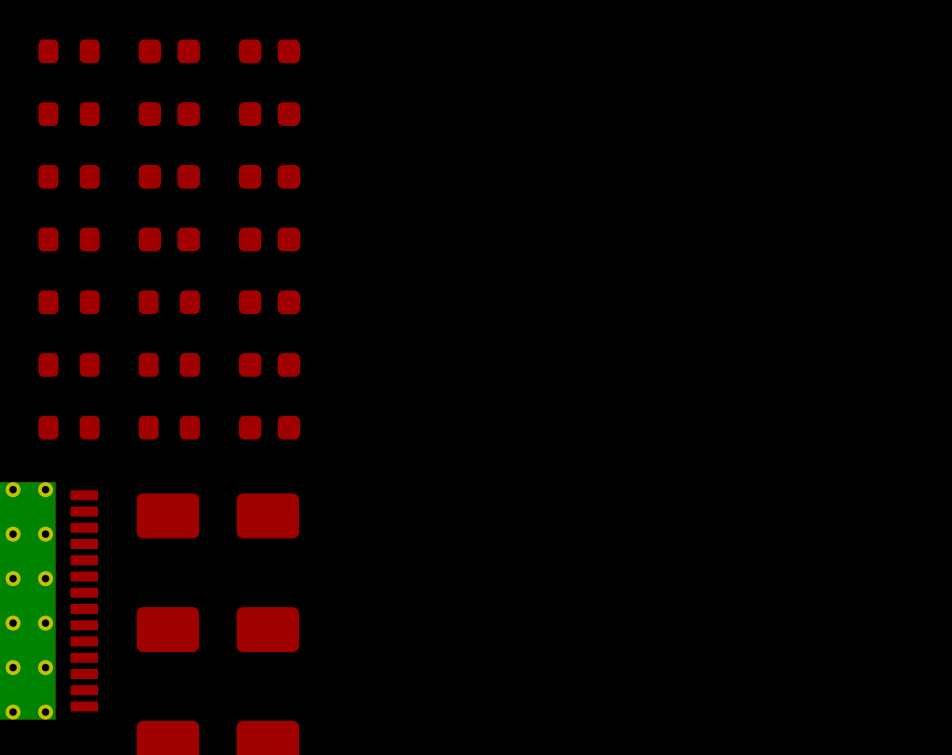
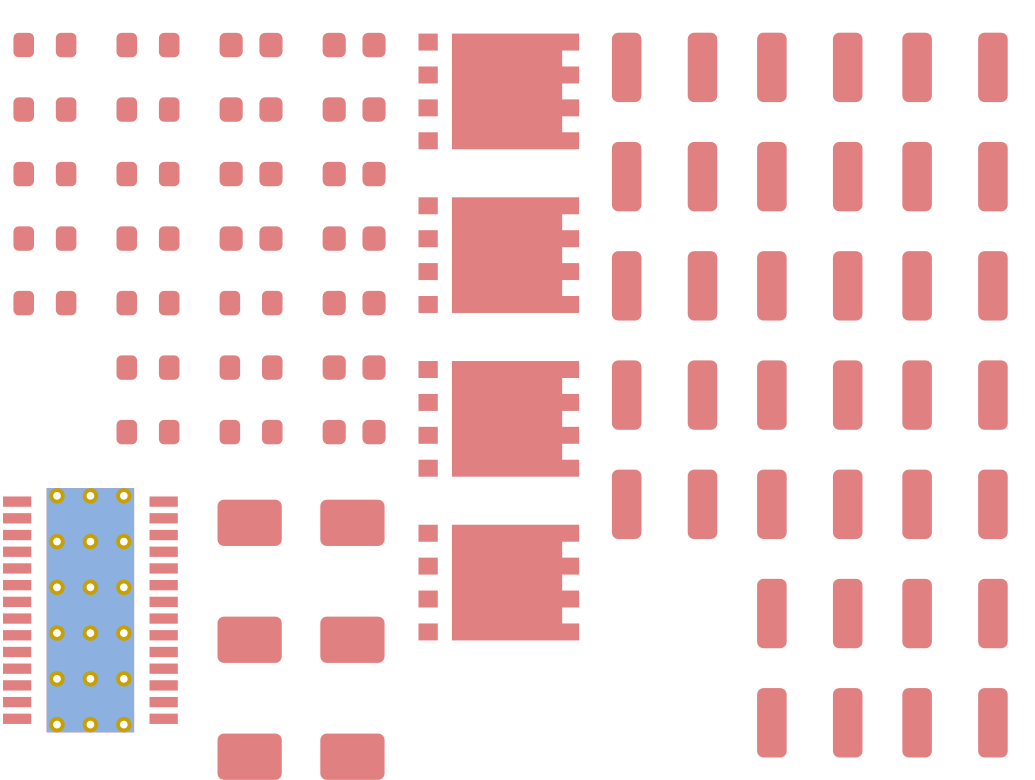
part: none -> (664, 67)
part: none -> (809, 67)
part: none -> (955, 67)
part: none -> (498, 91)
part: none -> (664, 176)
part: none -> (809, 176)
part: none -> (955, 176)
part: none -> (498, 255)
part: none -> (664, 285)
part: none -> (809, 285)
part: none -> (955, 285)
part: none -> (664, 395)
part: none -> (809, 395)
part: none -> (955, 395)
part: none -> (498, 418)
part: none -> (664, 504)
part: none -> (809, 504)
part: none -> (955, 504)
part: none -> (498, 582)
part: none -> (809, 613)
part: none -> (955, 613)
part: none -> (809, 722)
part: none -> (955, 722)

